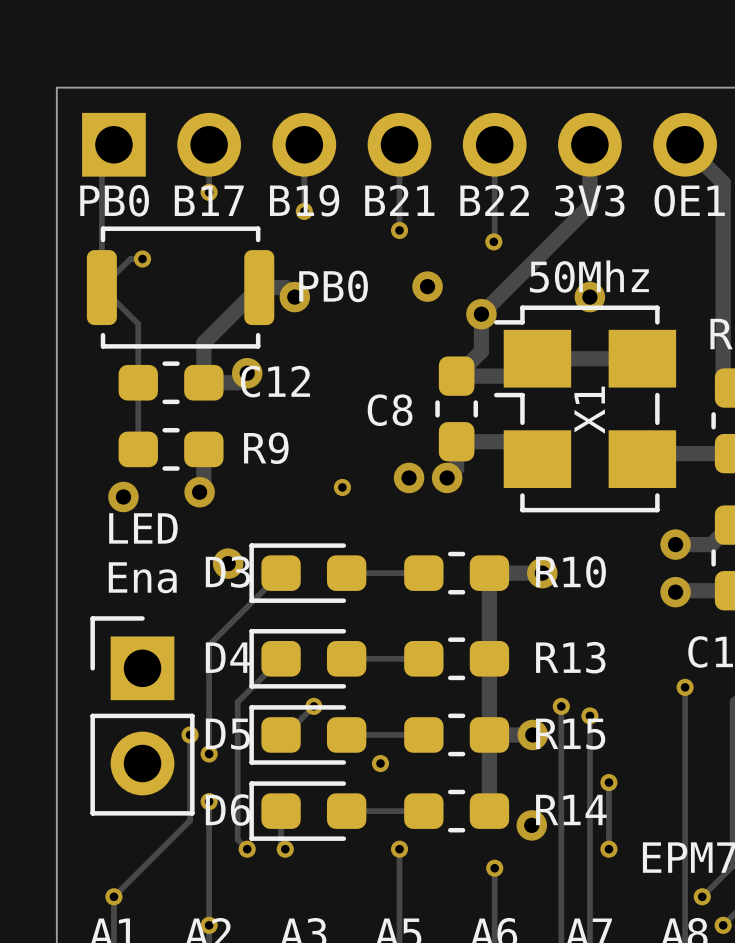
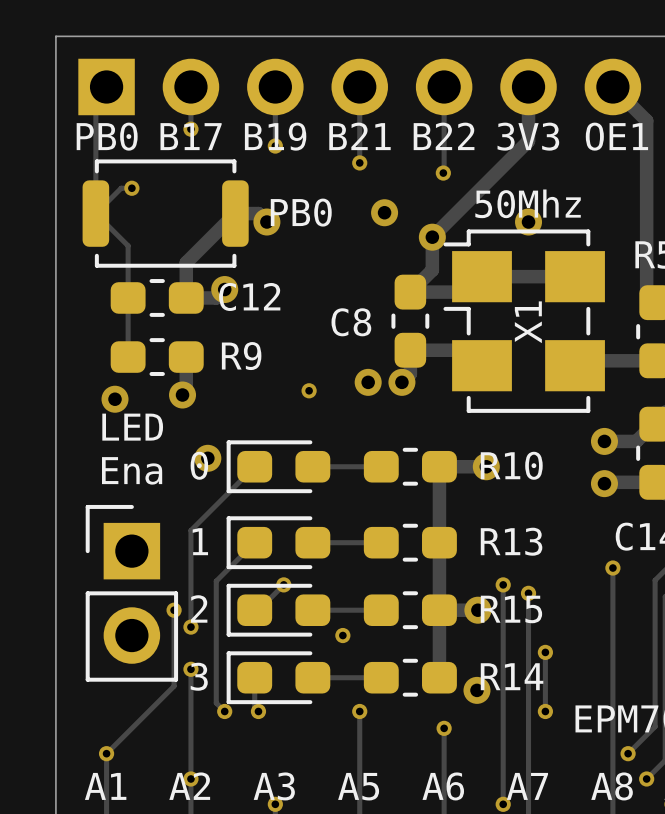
D3 name: D3 (228, 572) -> 0 (199, 465)
D4 name: D4 (228, 657) -> 1 (200, 541)
D5 name: D5 (227, 734) -> 2 (199, 608)
D6 name: D6 (228, 810) -> 3 (199, 676)

